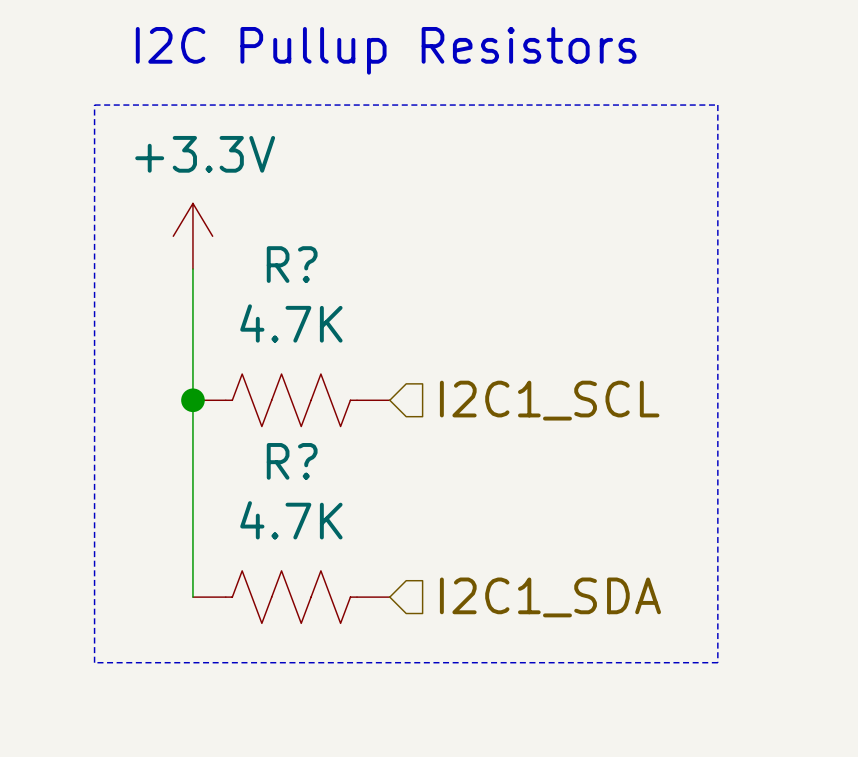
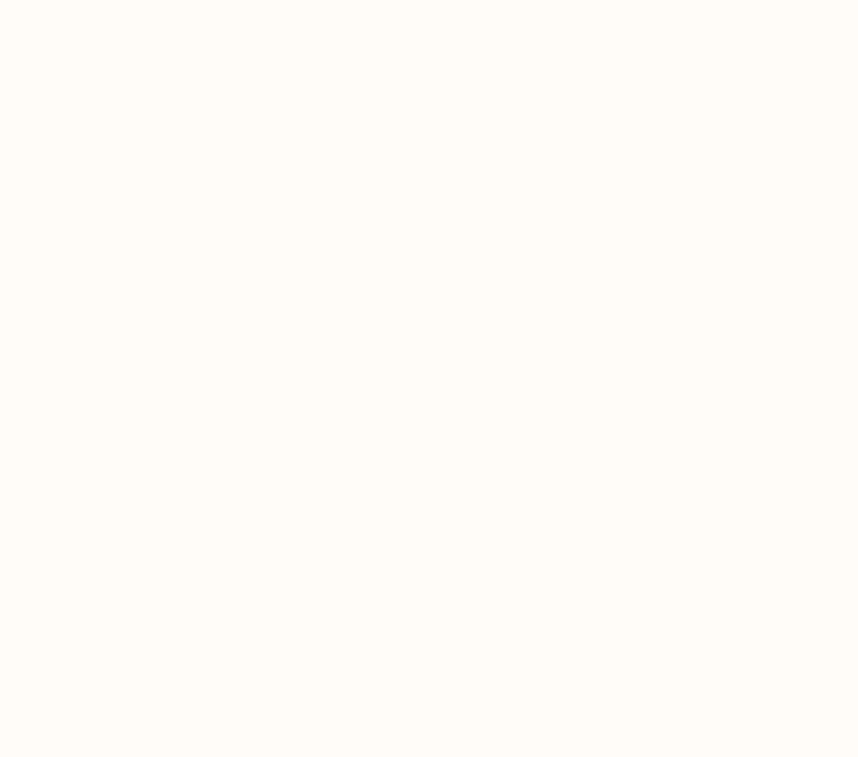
text: I2C Pullup Resistors (386, 50) -> none
line: (94, 105) (717, 105) (717, 662) (94, 662) (94, 105) -> none
power symbol: +3.3V (192, 236) -> none
wire: (192, 269) (192, 597) -> none
junction: (192, 400) -> none
R?: 4.7K (291, 400) -> none
hierarchical label: I2C1_SCL (549, 400) -> none
R?: 4.7K (291, 597) -> none
hierarchical label: I2C1_SDA (550, 597) -> none

